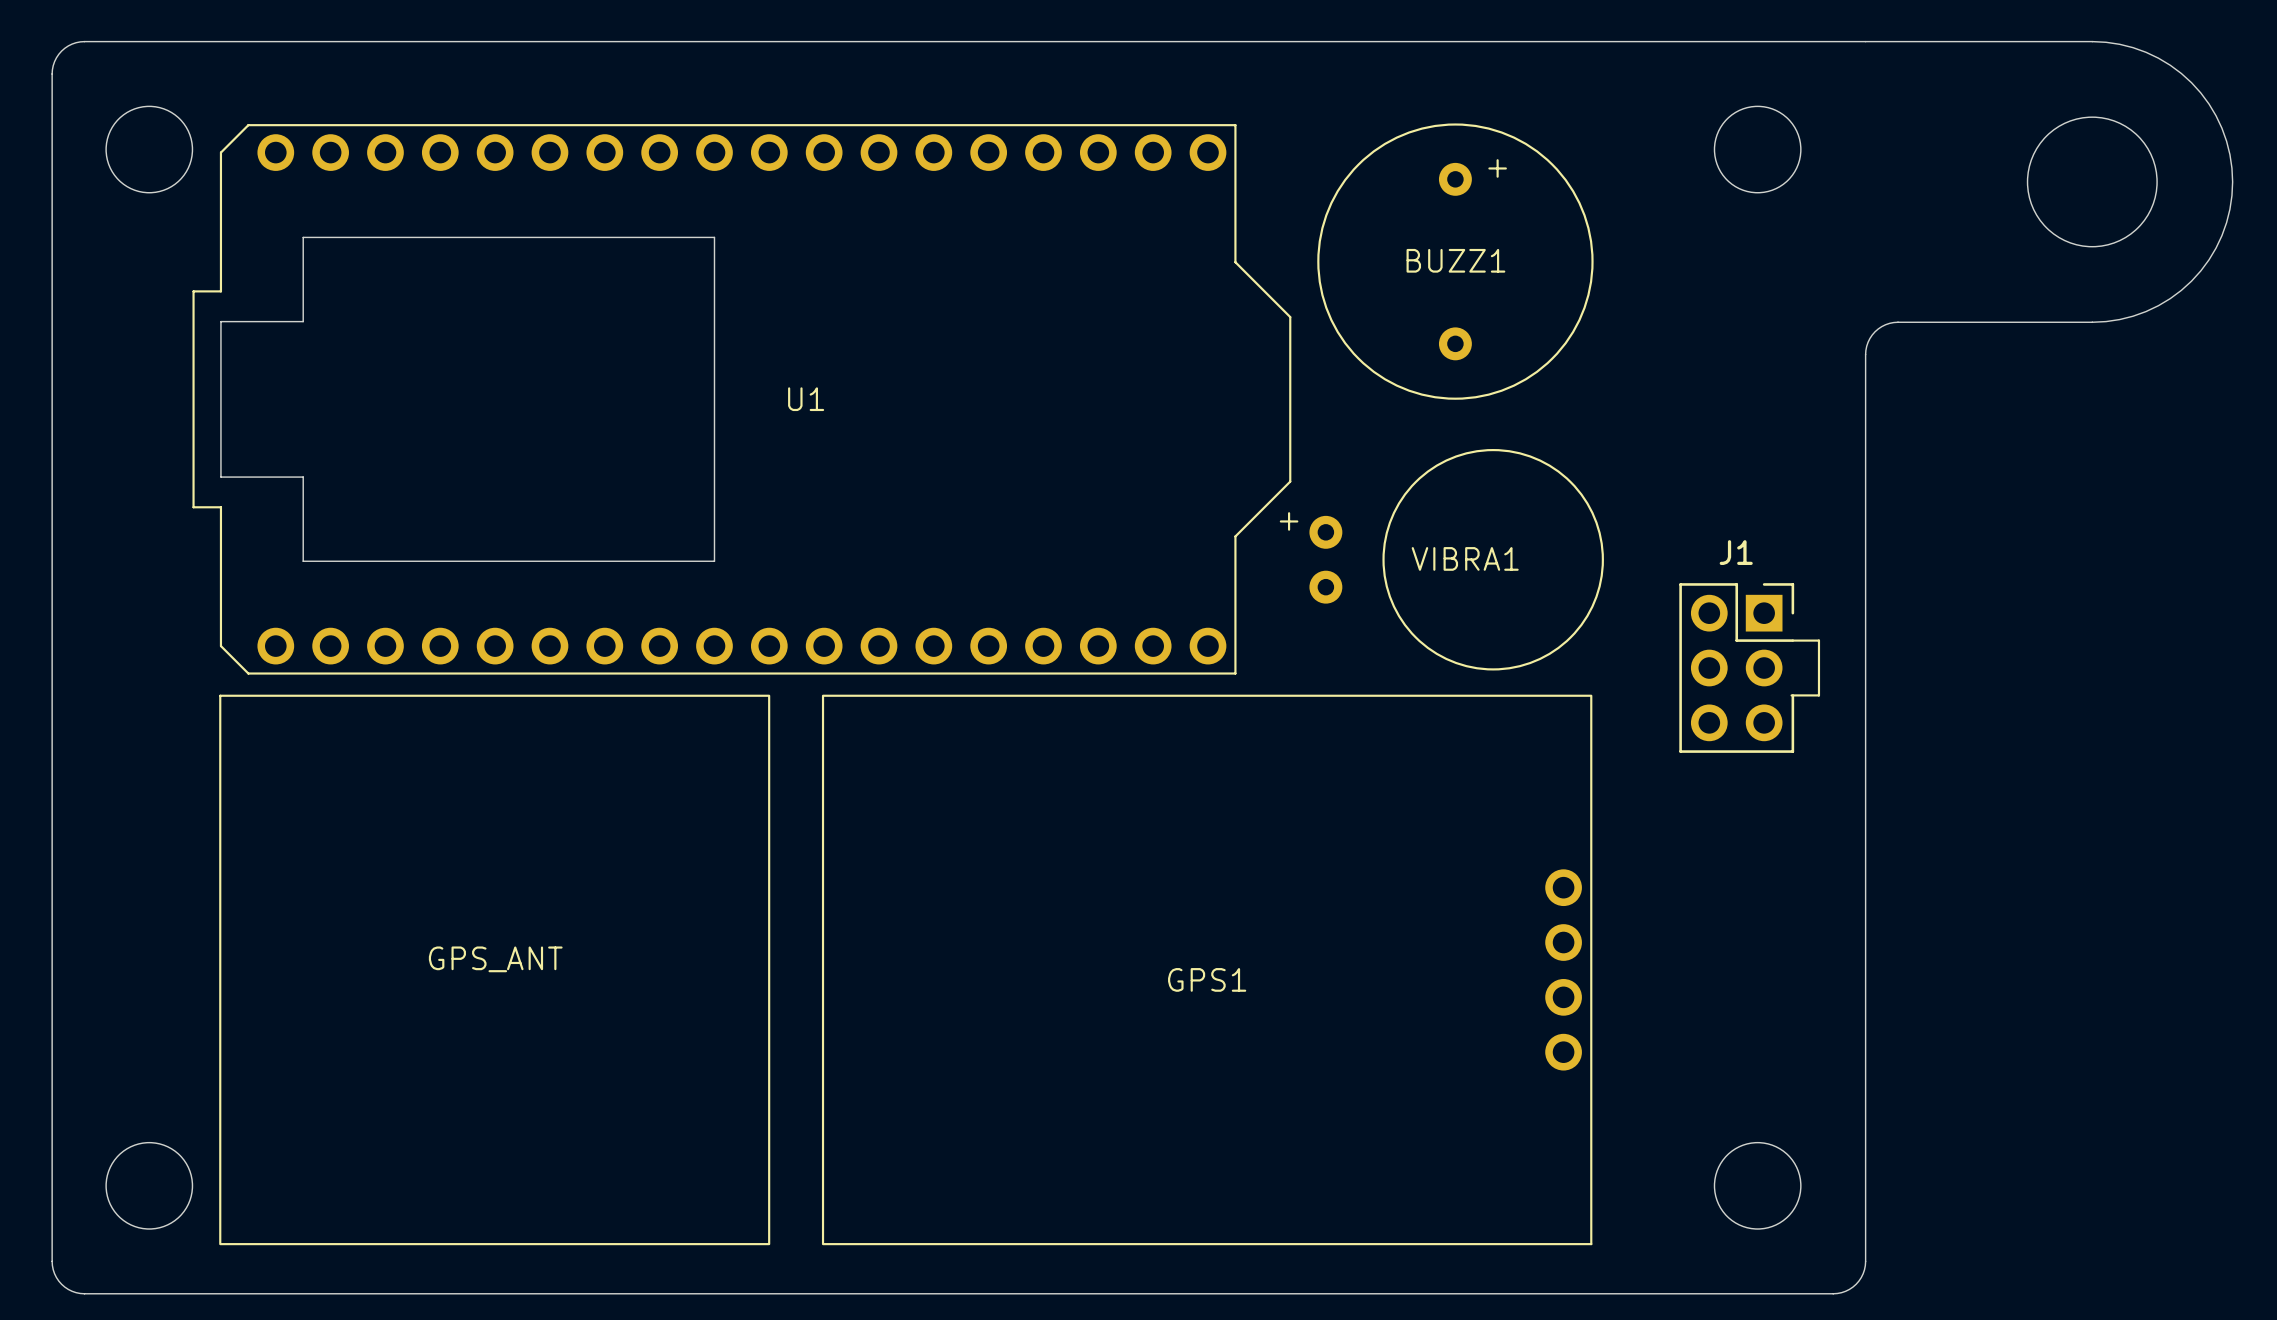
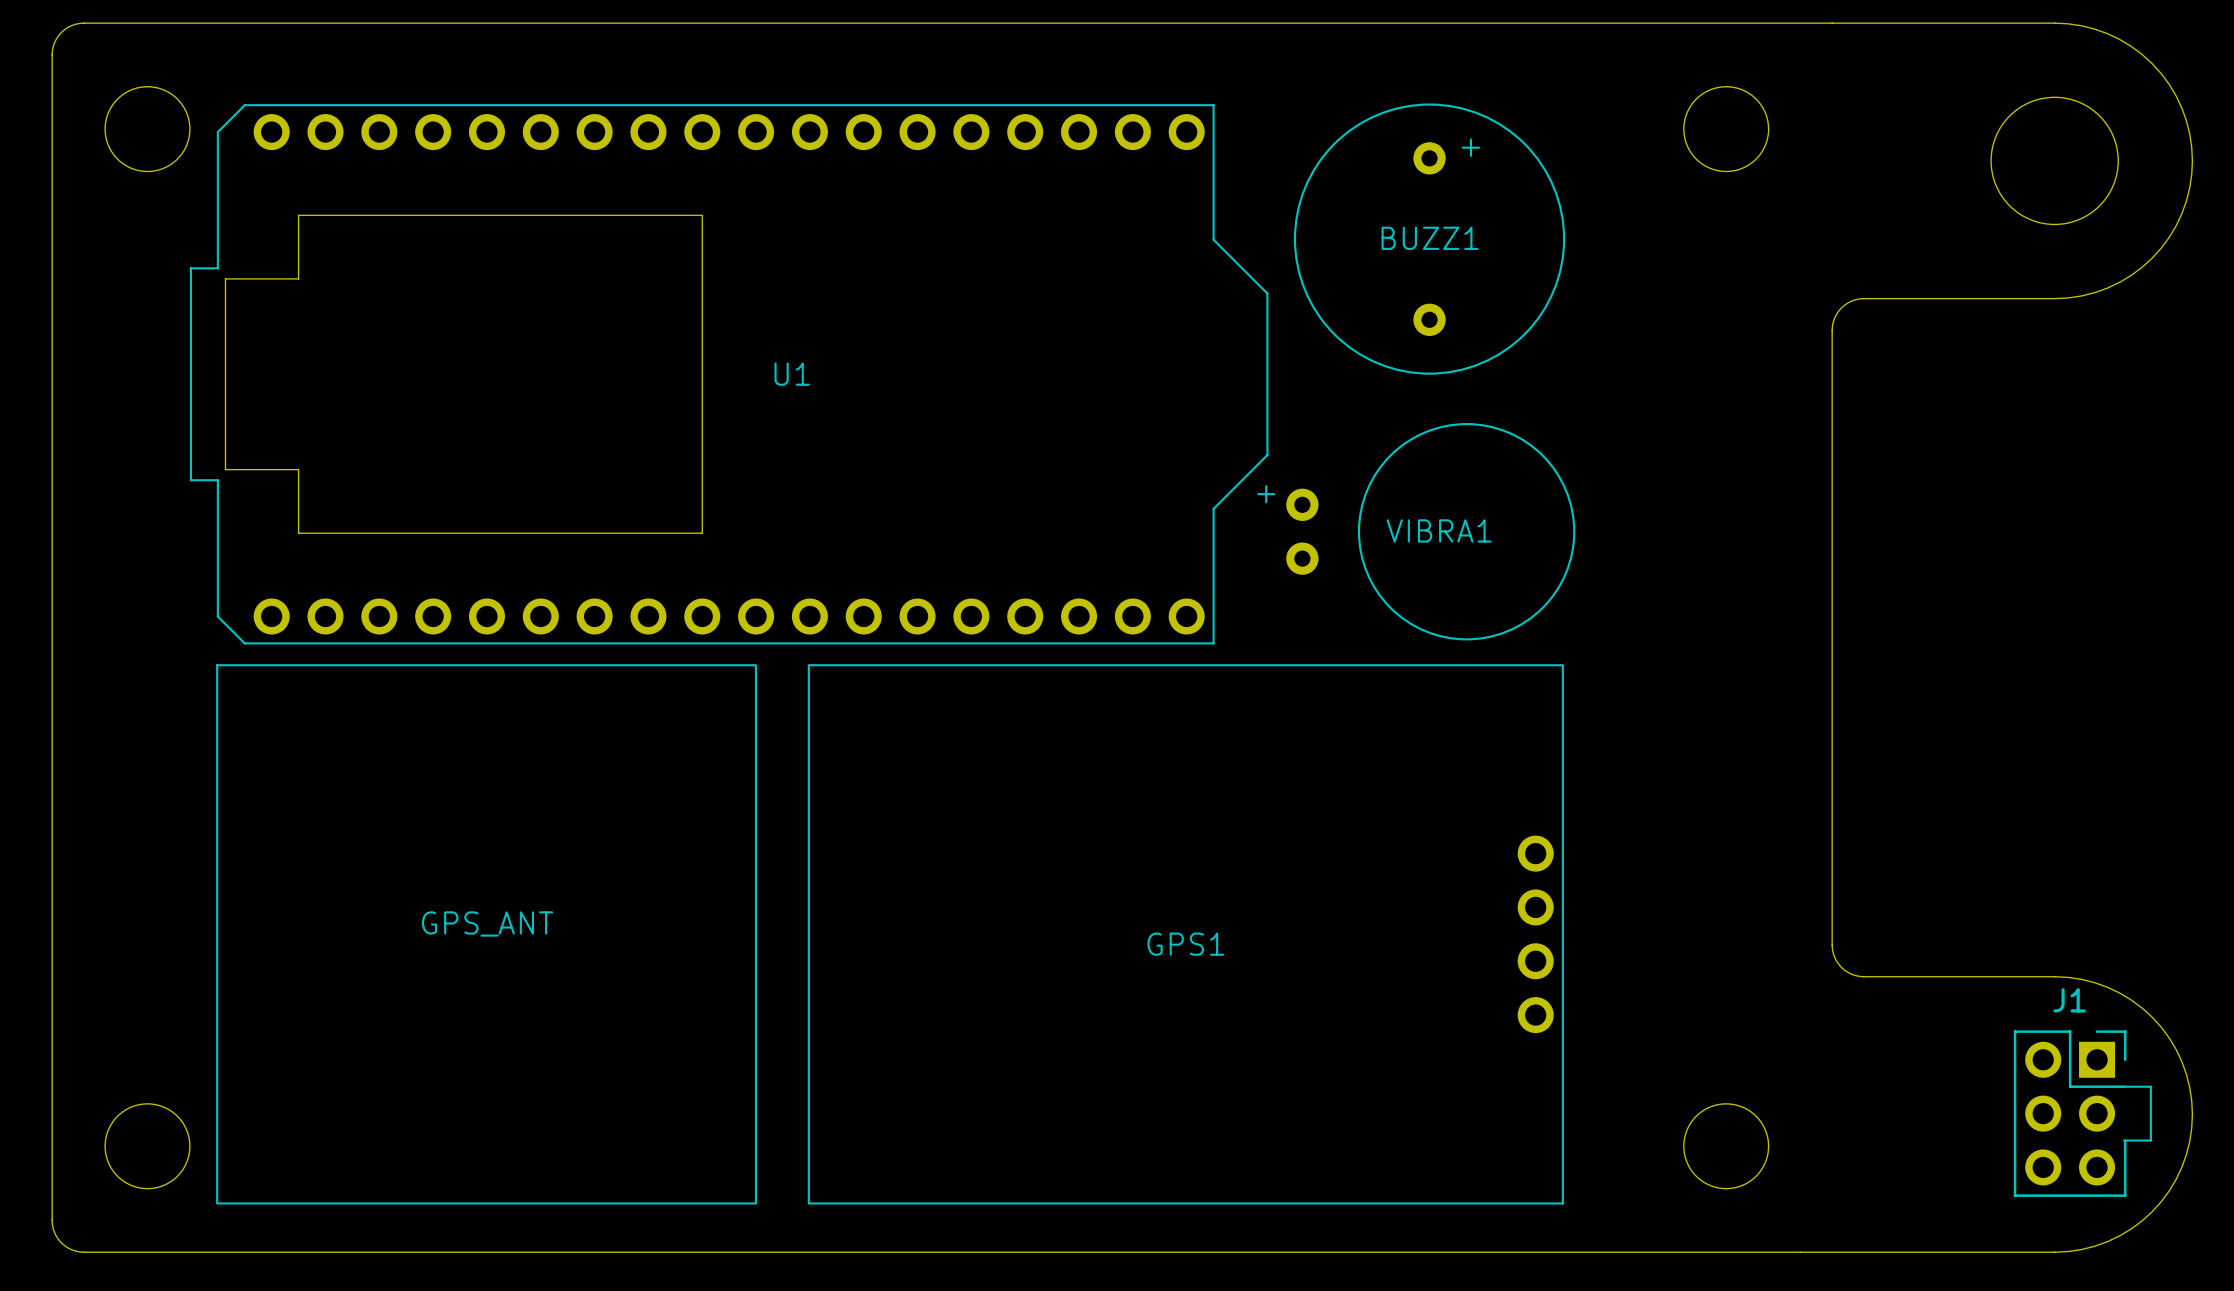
U1 footprint: [192, 124, 1292, 675] -> [189, 104, 1269, 645]
J1 position: (1749, 668) -> (2082, 1113)
board edge: (1865, 980) (1865, 1265) (1861, 1277) (1852, 1287) (1841, 1292) (1833, 1293) -> (1832, 944) (1833, 953) (1838, 964) (1848, 972) (1859, 976) (2068, 977) (2094, 982) (2119, 992) (2152, 1017) (2176, 1049) (2189, 1087) (2191, 1127) (2181, 1167) (2161, 1201) (2131, 1228) (2094, 1246) (2054, 1252) (1800, 1252)

